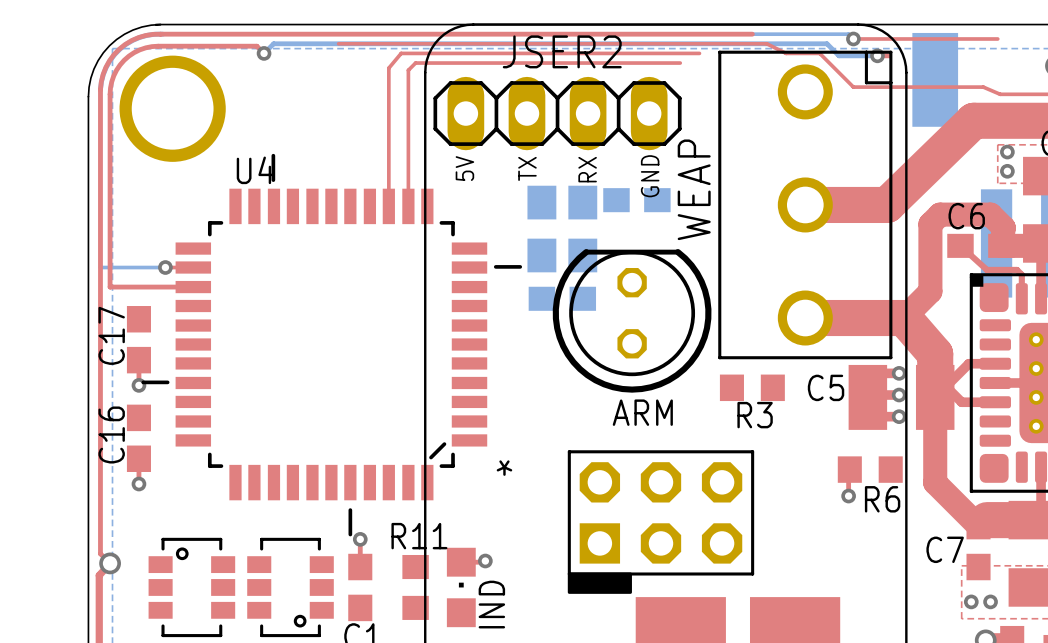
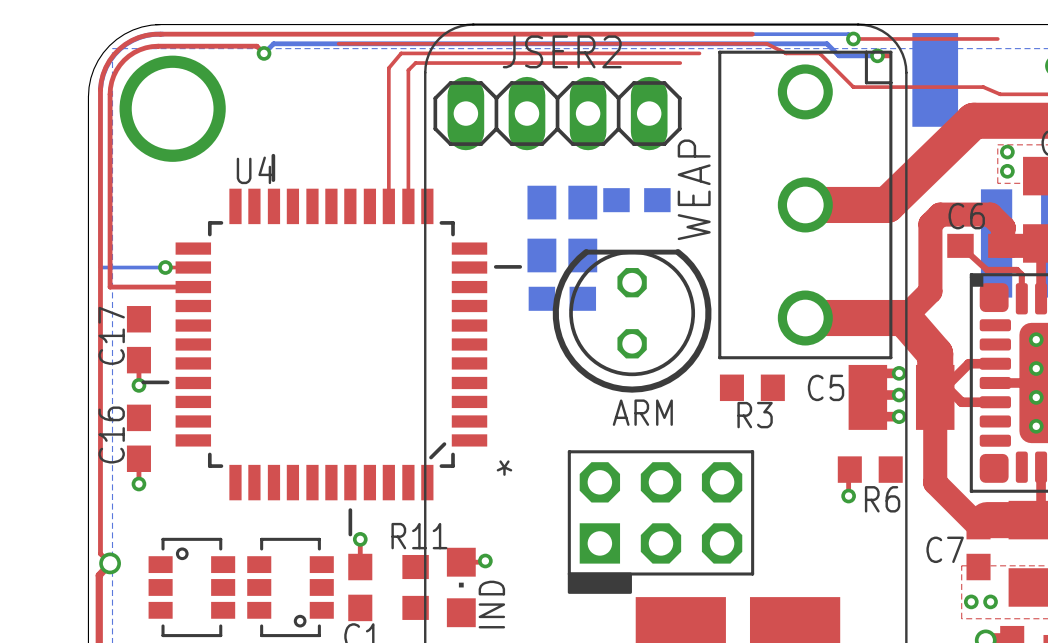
text: 5V (464, 168) -> none
text: TX (527, 168) -> none
text: RX (587, 169) -> none
text: GND (650, 176) -> none

